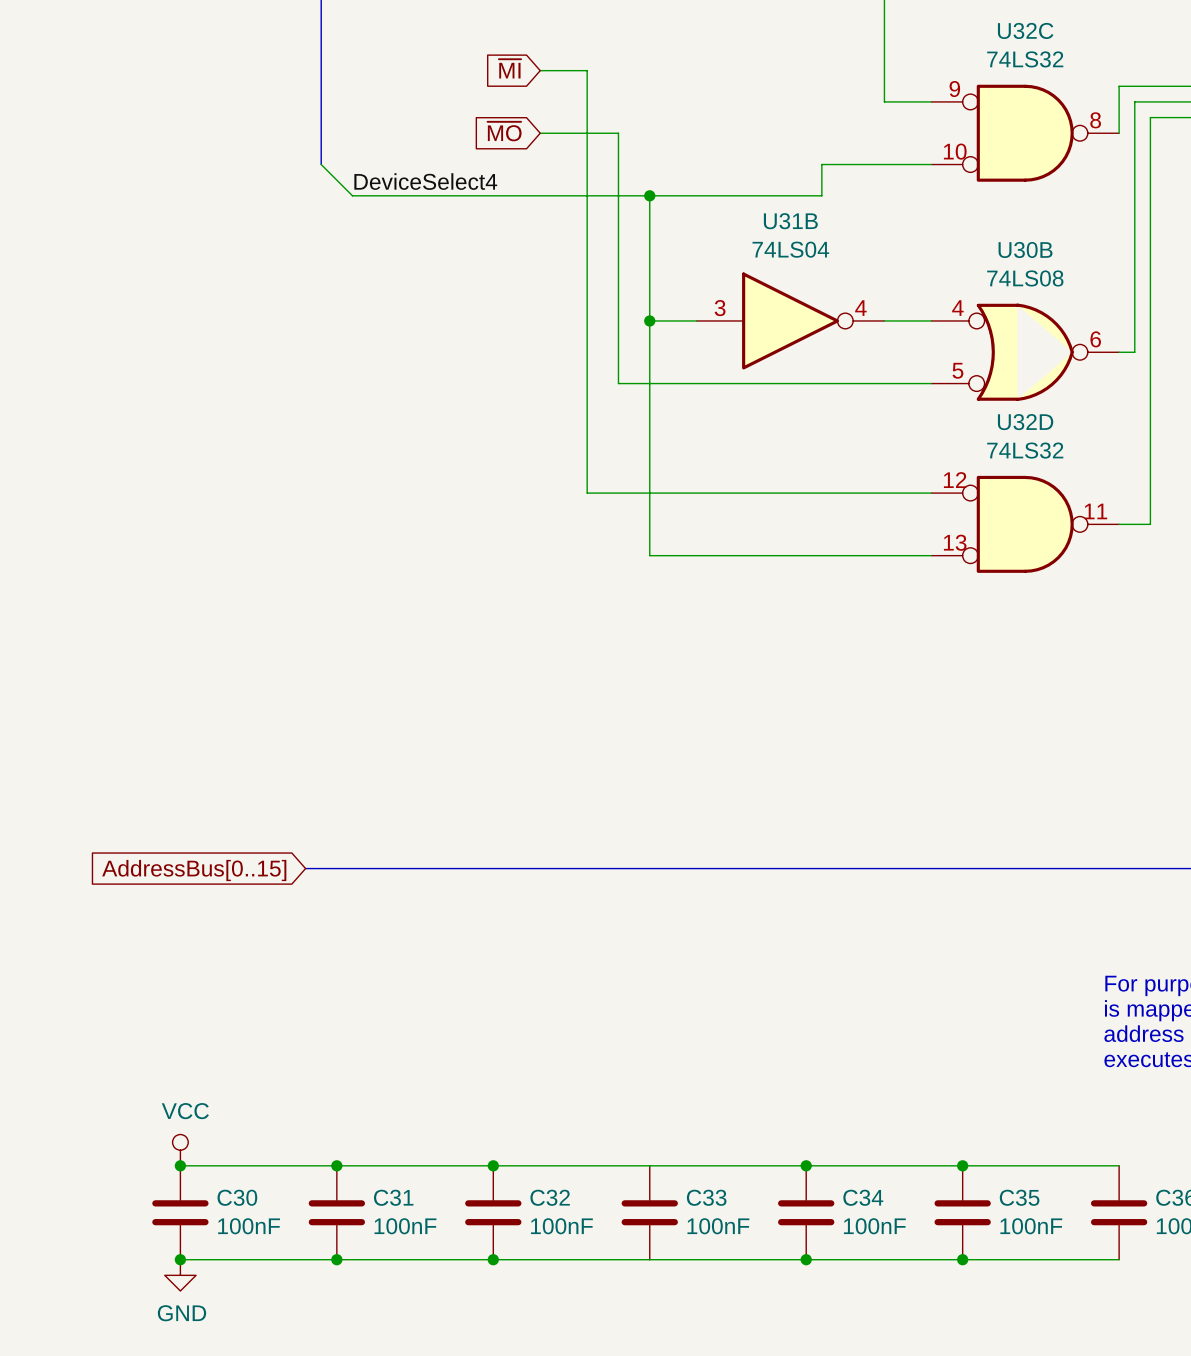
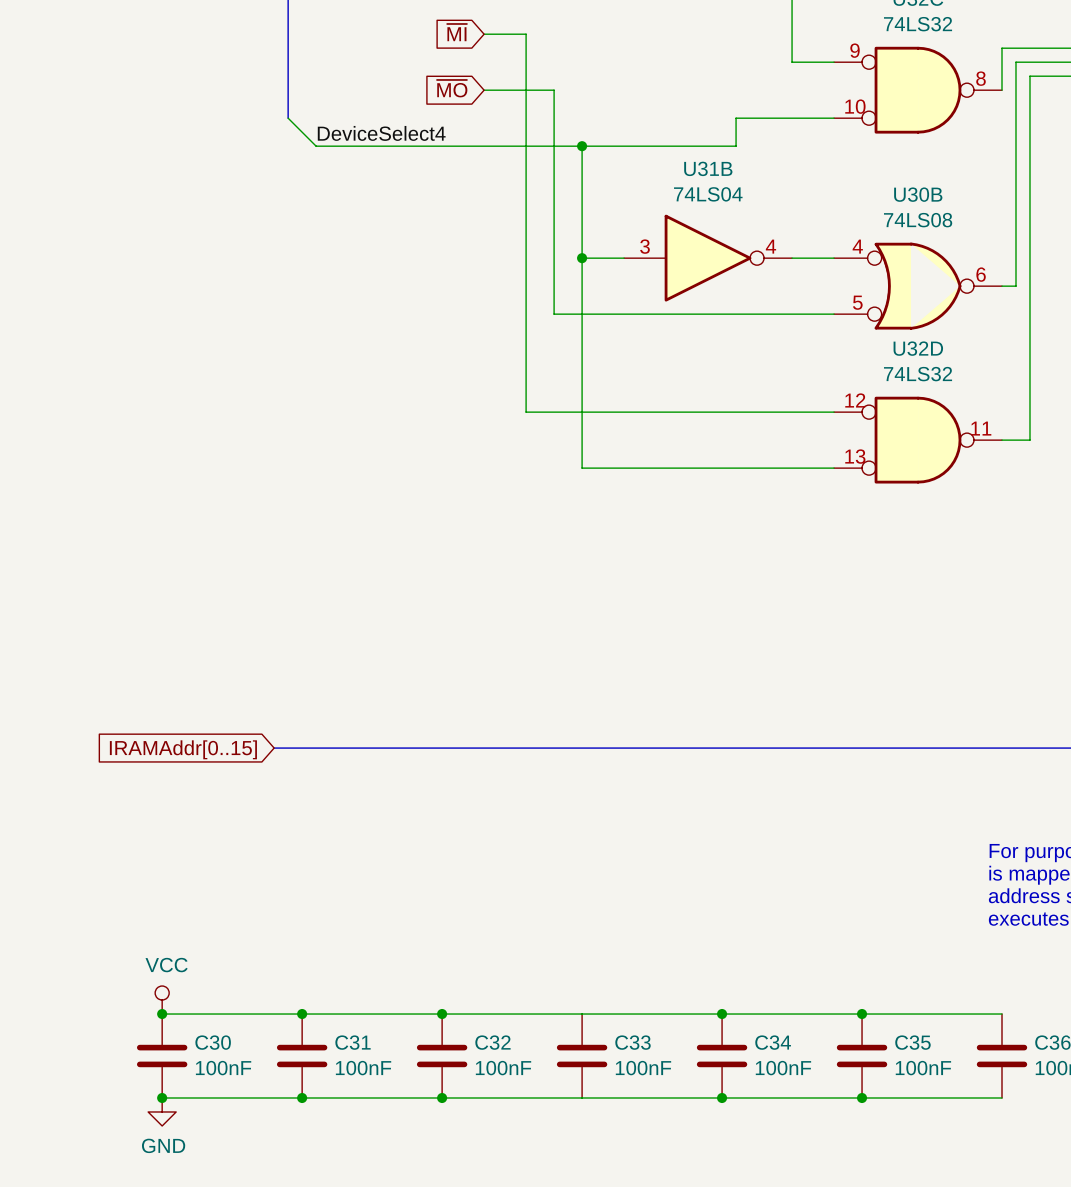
global label: AddressBus[0..15] (194, 870) -> IRAMAddr[0..15] (183, 749)

